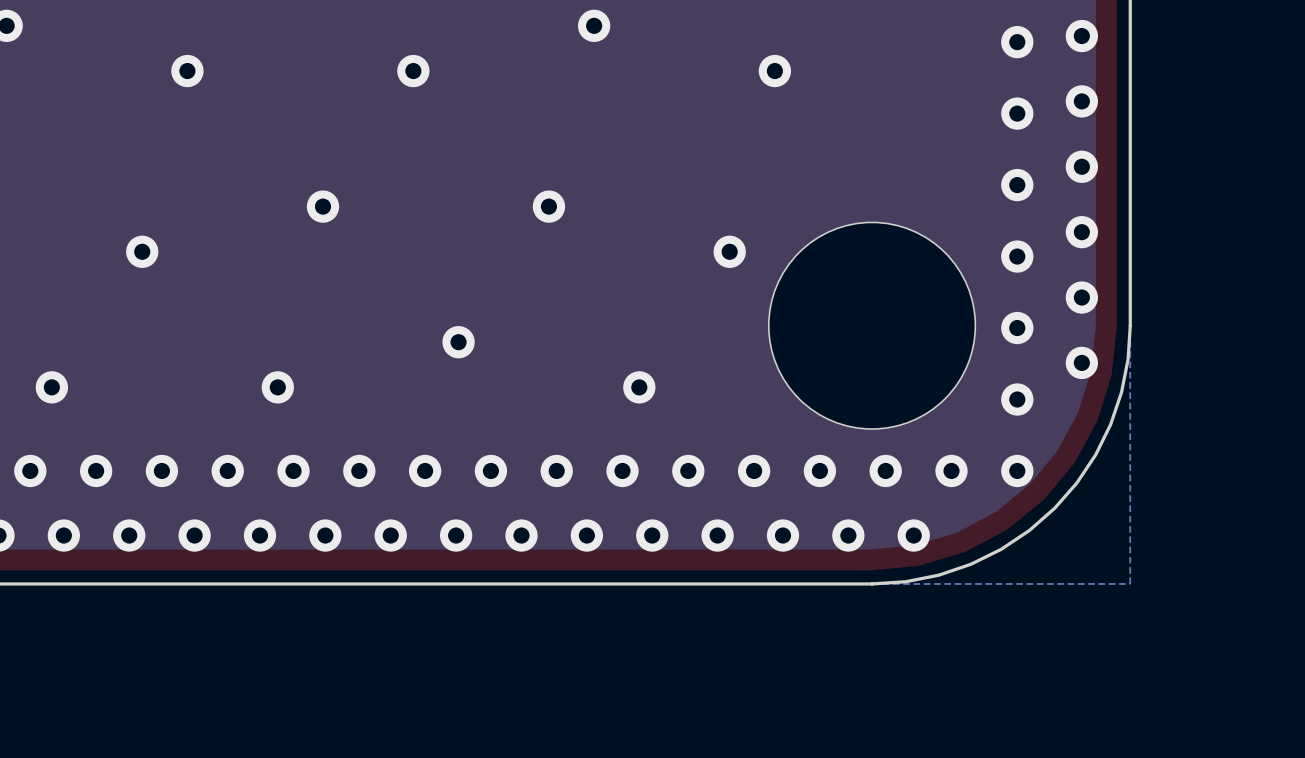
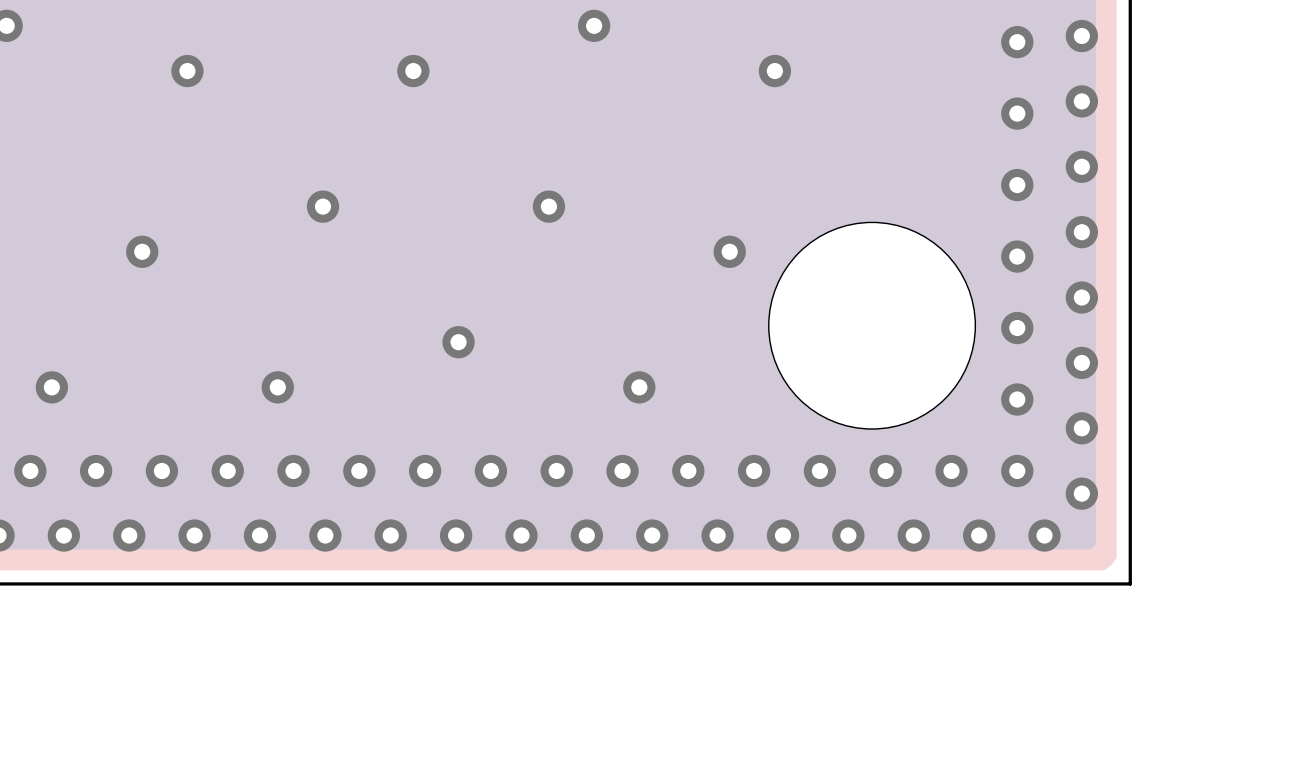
board edge: (1130, 325) (1128, 359) (1121, 392) (1110, 424) (1095, 454) (1076, 482) (1054, 508) (1029, 530) (1001, 549) (970, 564) (938, 575) (905, 581) (872, 583) -> (1130, 325) (1130, 583) (872, 583)
via: none -> (1081, 428)
via: none -> (1081, 493)
via: none -> (979, 535)
via: none -> (1044, 535)

